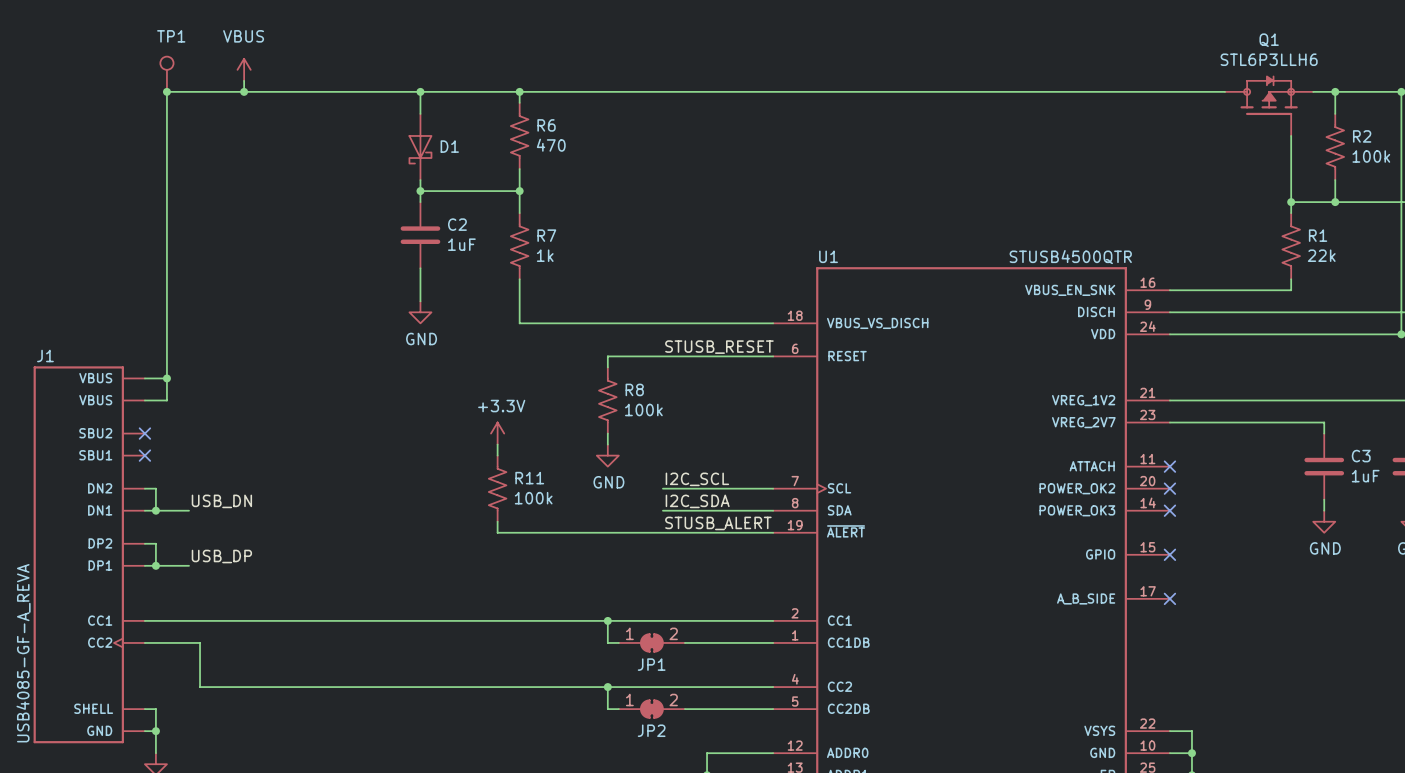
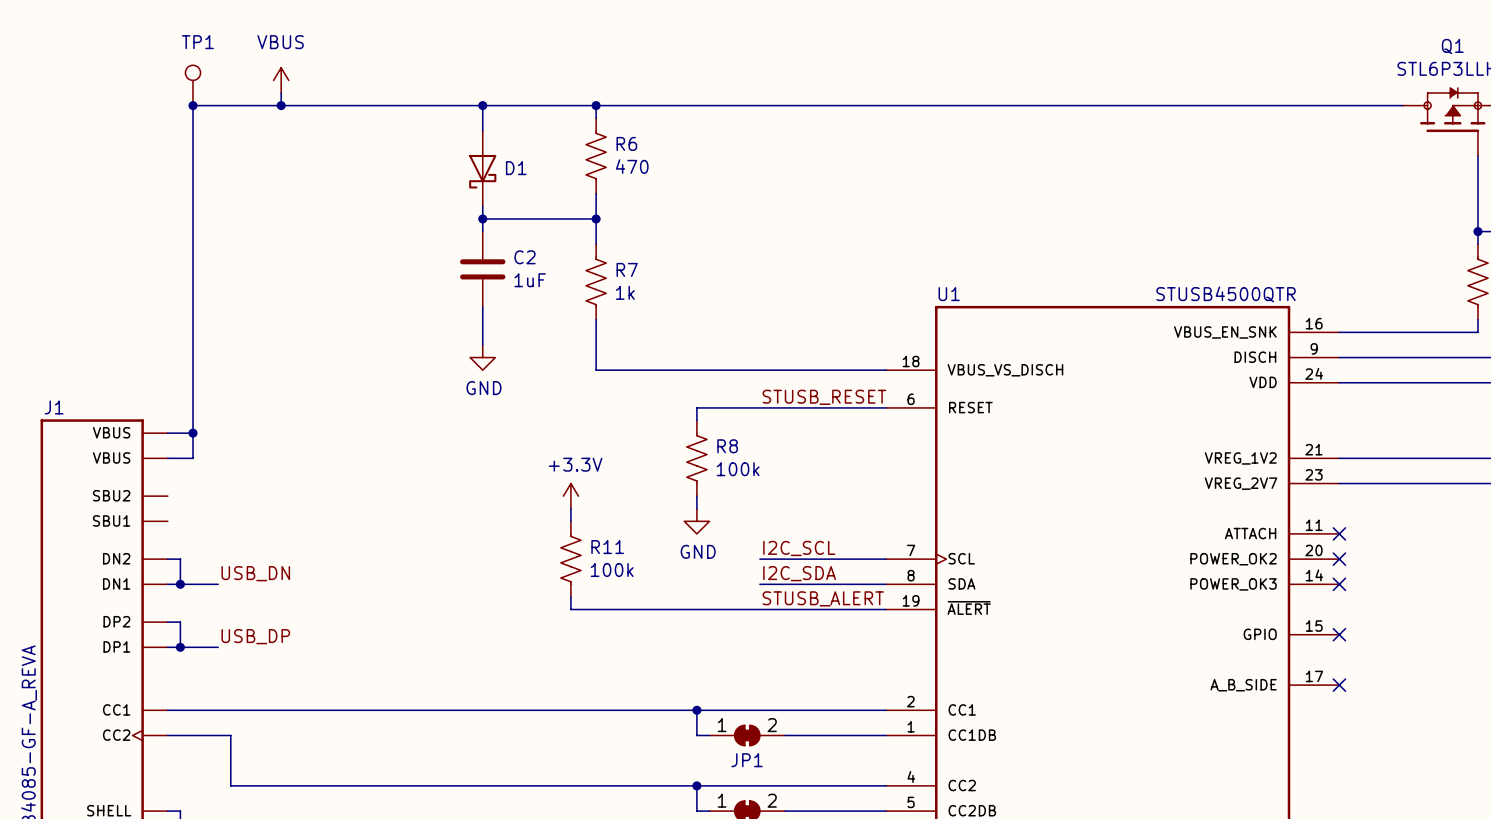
no-connect mark: (144, 433) -> none
no-connect mark: (144, 455) -> none

